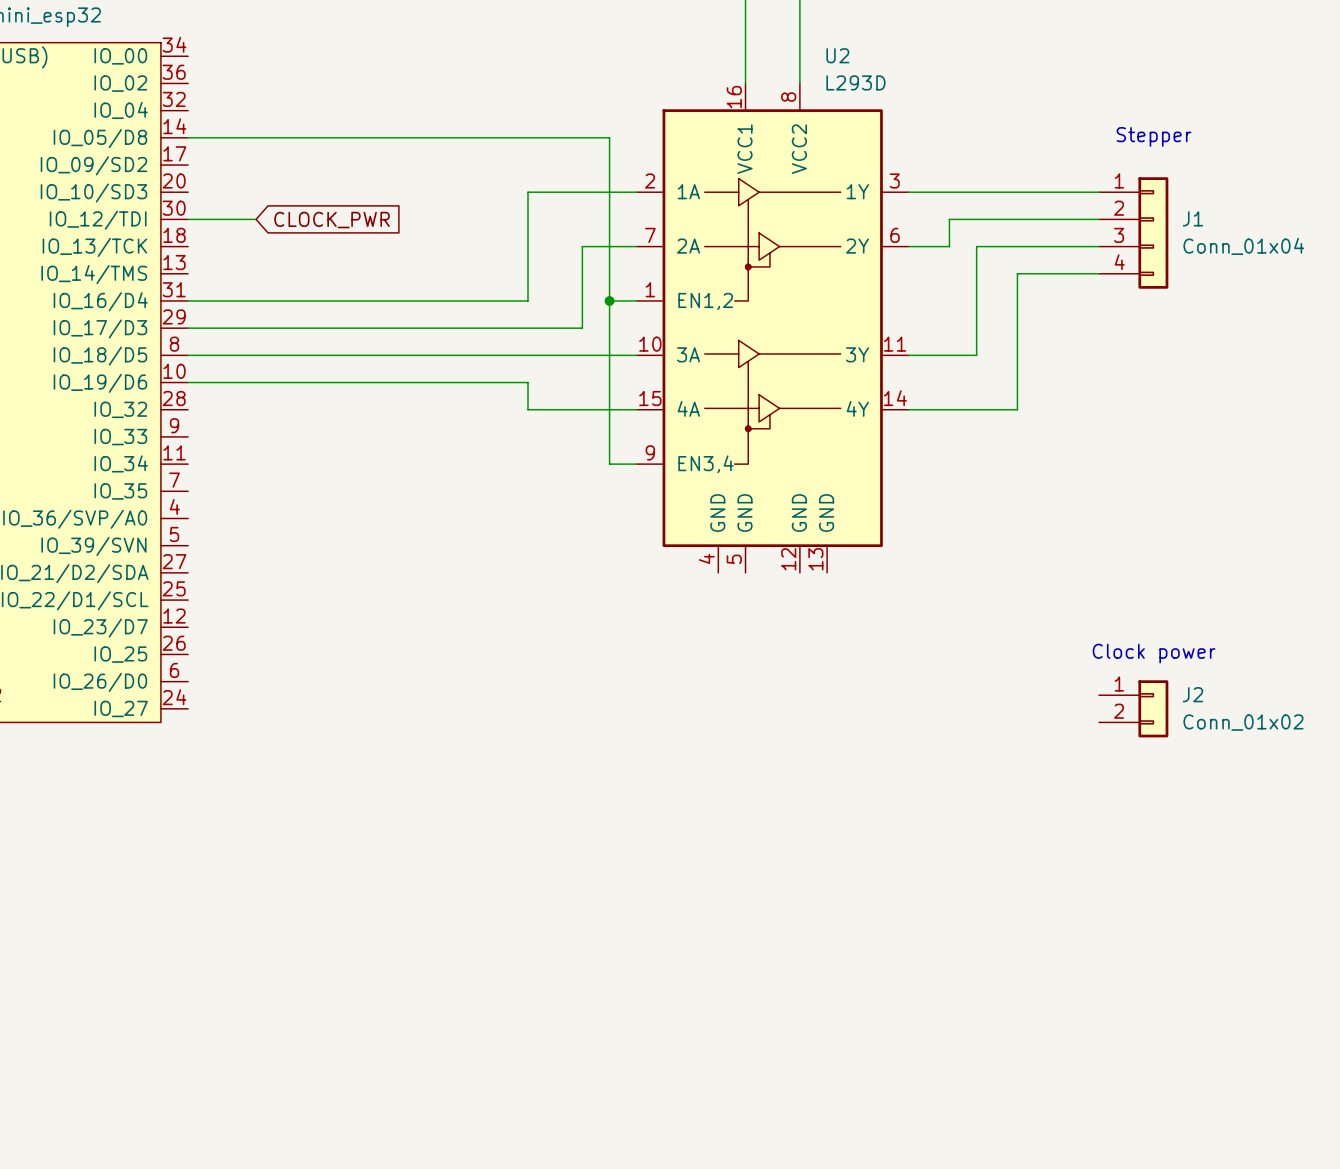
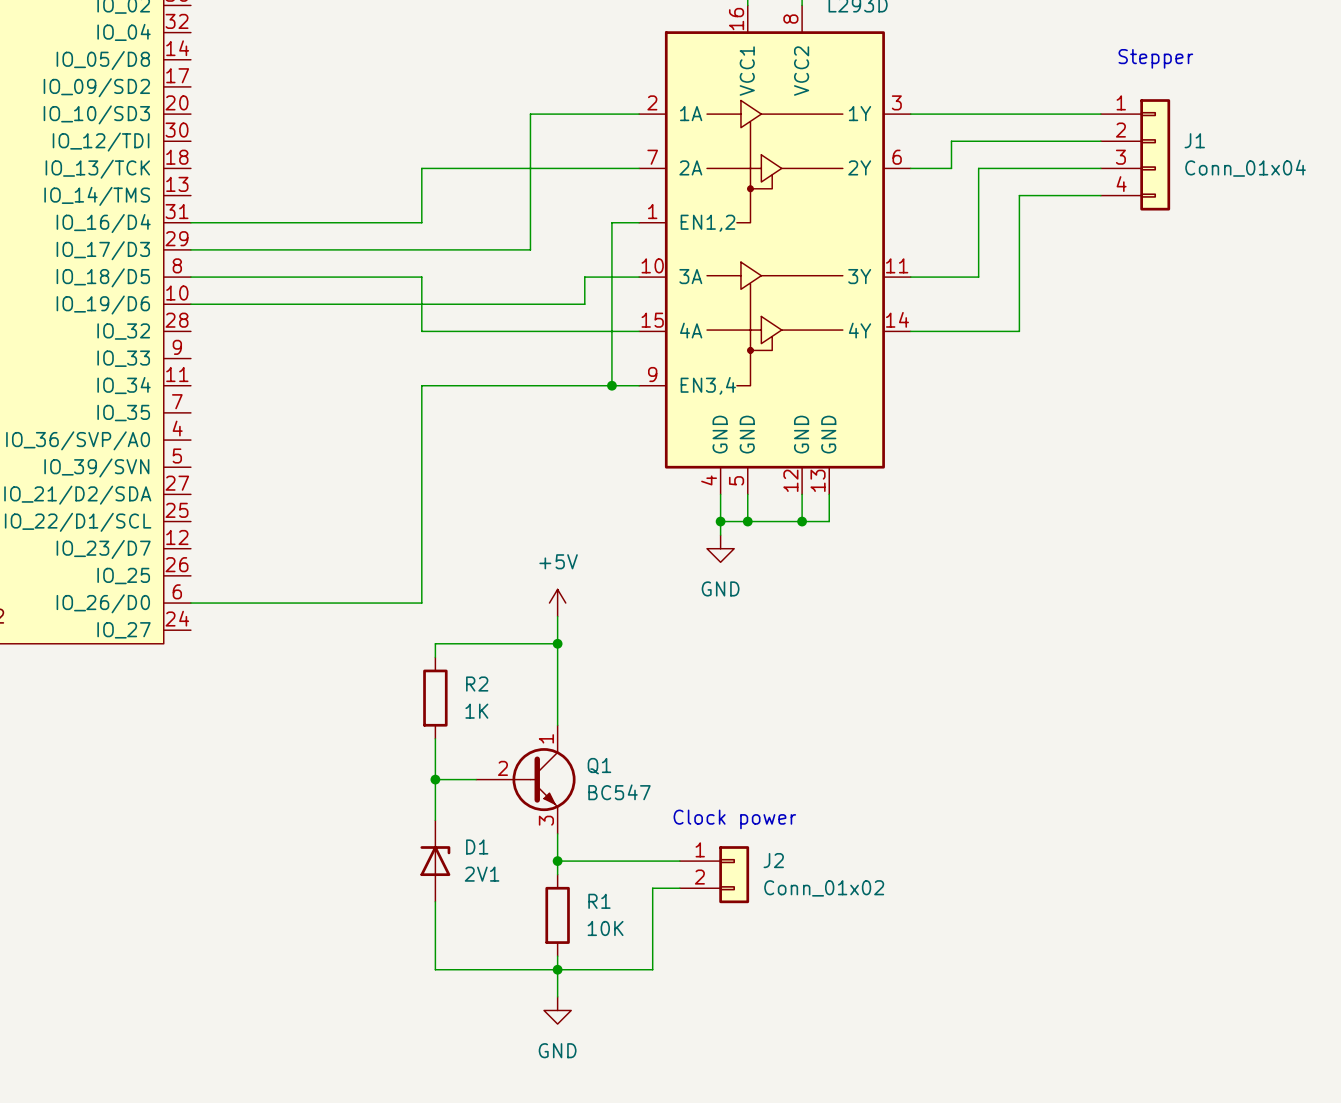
wire: (188, 137) (609, 137) (609, 300) -> none
wire: (188, 219) (256, 219) -> none
global label: CLOCK_PWR (332, 220) -> none
wire: (582, 246) (582, 328) (528, 328) -> (530, 222) (530, 249)
wire: (419, 300) (528, 300) -> (421, 222) (421, 168) (584, 168)
junction: (609, 300) -> none
wire: (419, 355) (582, 355) -> (421, 277) (421, 331) (530, 331)
wire: (528, 382) (528, 409) -> (530, 304) (584, 304) (584, 277)
wire: none -> (611, 385) (421, 385) (421, 603) (190, 603)
junction: none -> (611, 385)
wire: none -> (720, 494) (720, 535)
wire: none -> (747, 494) (747, 521)
wire: none -> (802, 494) (802, 521)
wire: none -> (829, 494) (829, 521) (720, 521)
junction: none -> (720, 521)
junction: none -> (747, 521)
junction: none -> (802, 521)
power symbol: none -> GND (720, 548)
text: Clock power (1154, 653) -> none
power symbol: none -> +5V (557, 603)
wire: none -> (557, 616) (557, 725)
J2 position: (1133, 708) -> (714, 874)
wire: none -> (557, 643) (435, 643) (435, 657)
junction: none -> (557, 643)
R2: none -> 1K (435, 698)
wire: none -> (435, 738) (435, 820)
wire: none -> (435, 779) (476, 779)
junction: none -> (435, 779)
Q1: none -> BC547 (525, 779)
text: none -> Clock power (734, 819)
wire: none -> (557, 833) (557, 874)
D1: none -> 2V1 (435, 861)
wire: none -> (557, 861) (679, 861)
junction: none -> (557, 861)
wire: none -> (679, 888) (652, 888) (652, 969) (435, 969) (435, 901)
R1: none -> 10K (557, 915)
wire: none -> (557, 956) (557, 996)
junction: none -> (557, 969)
power symbol: none -> GND (557, 1010)

